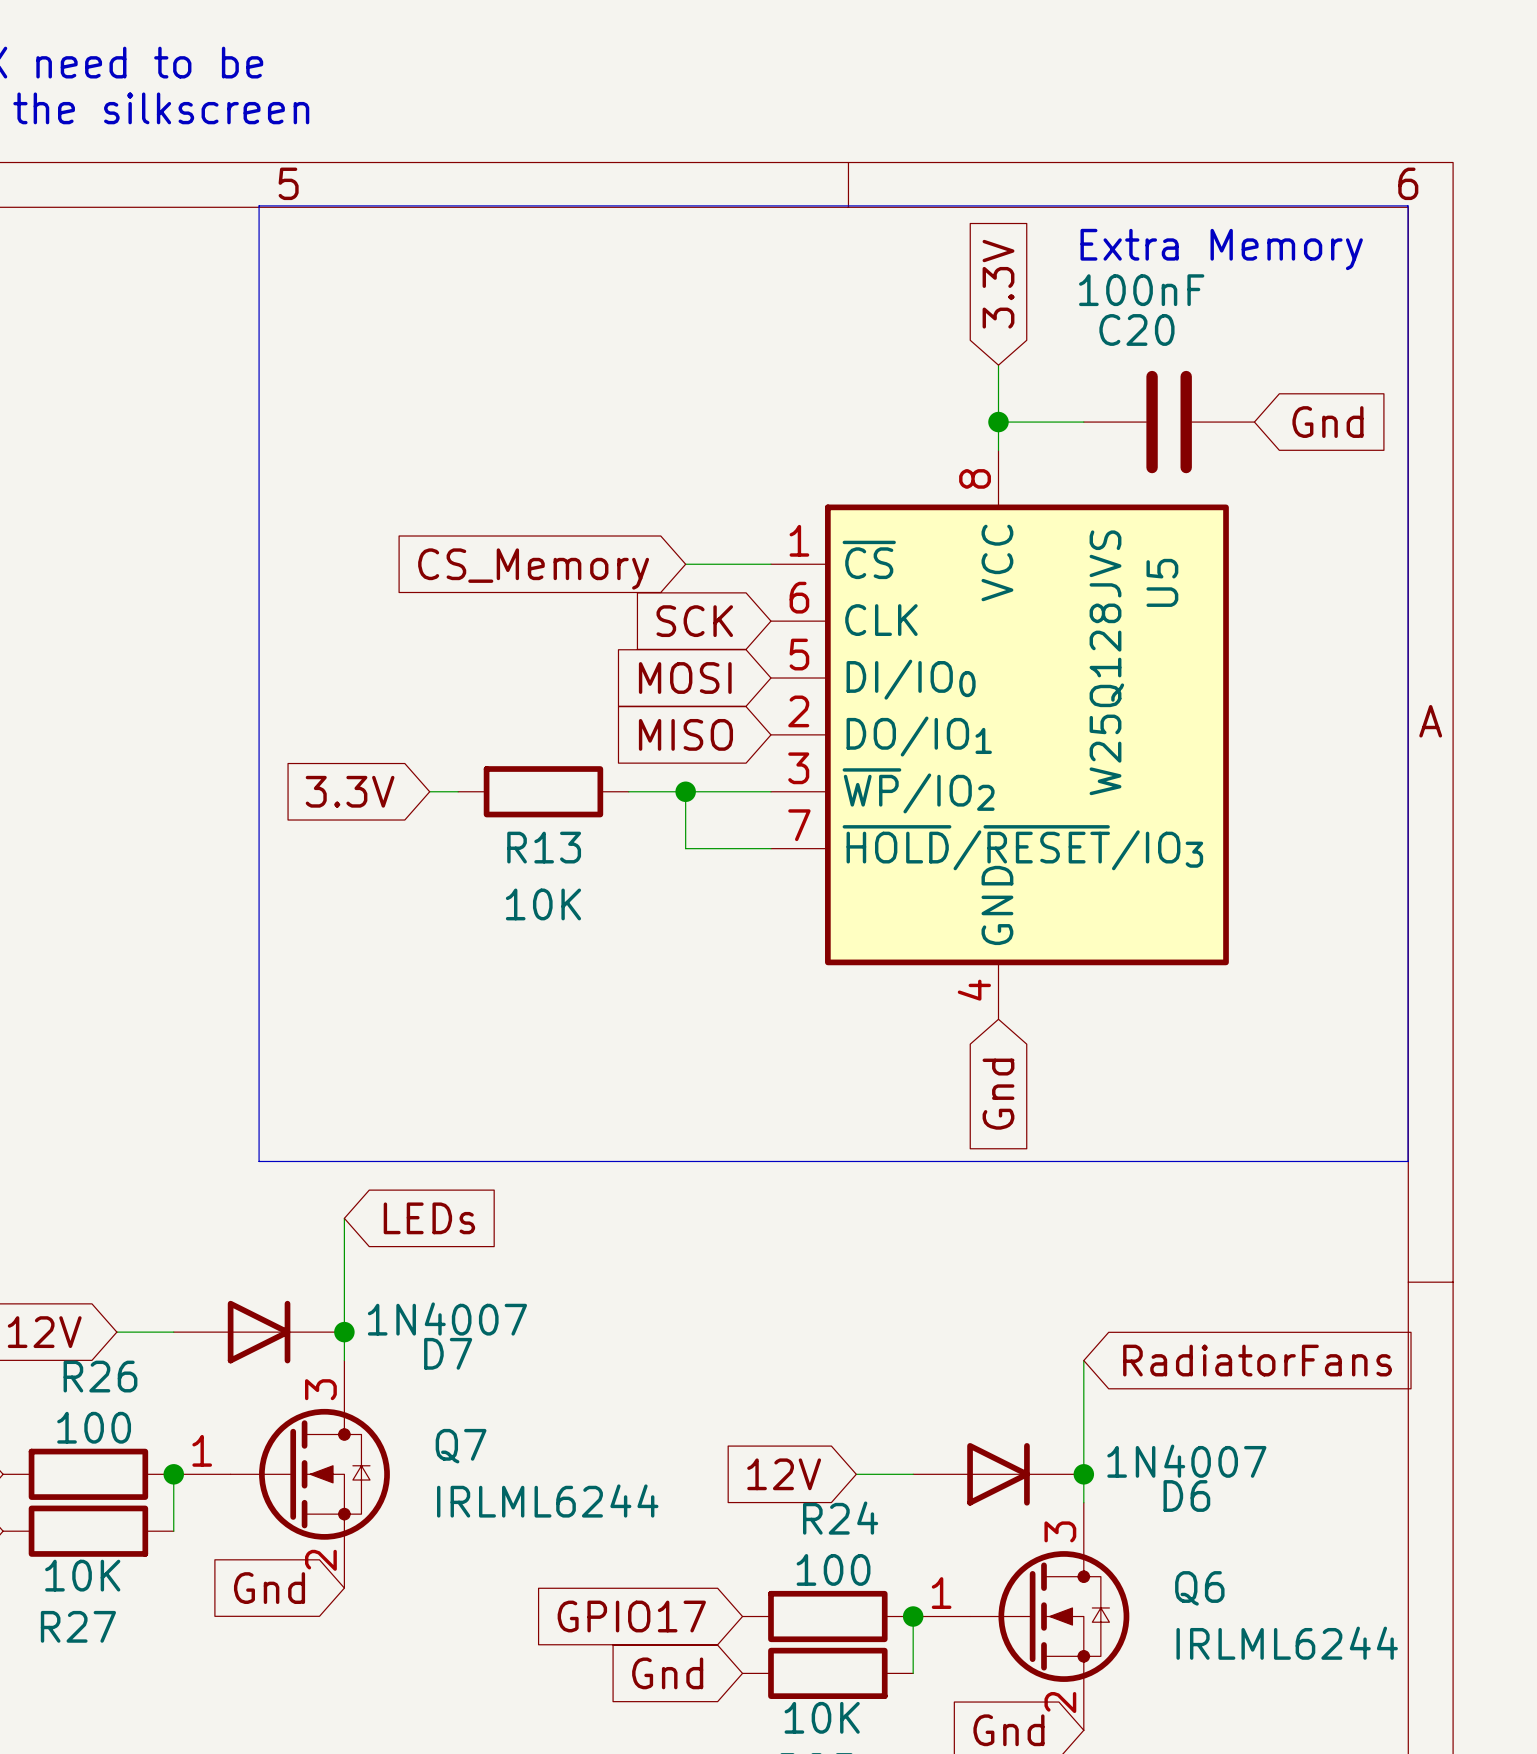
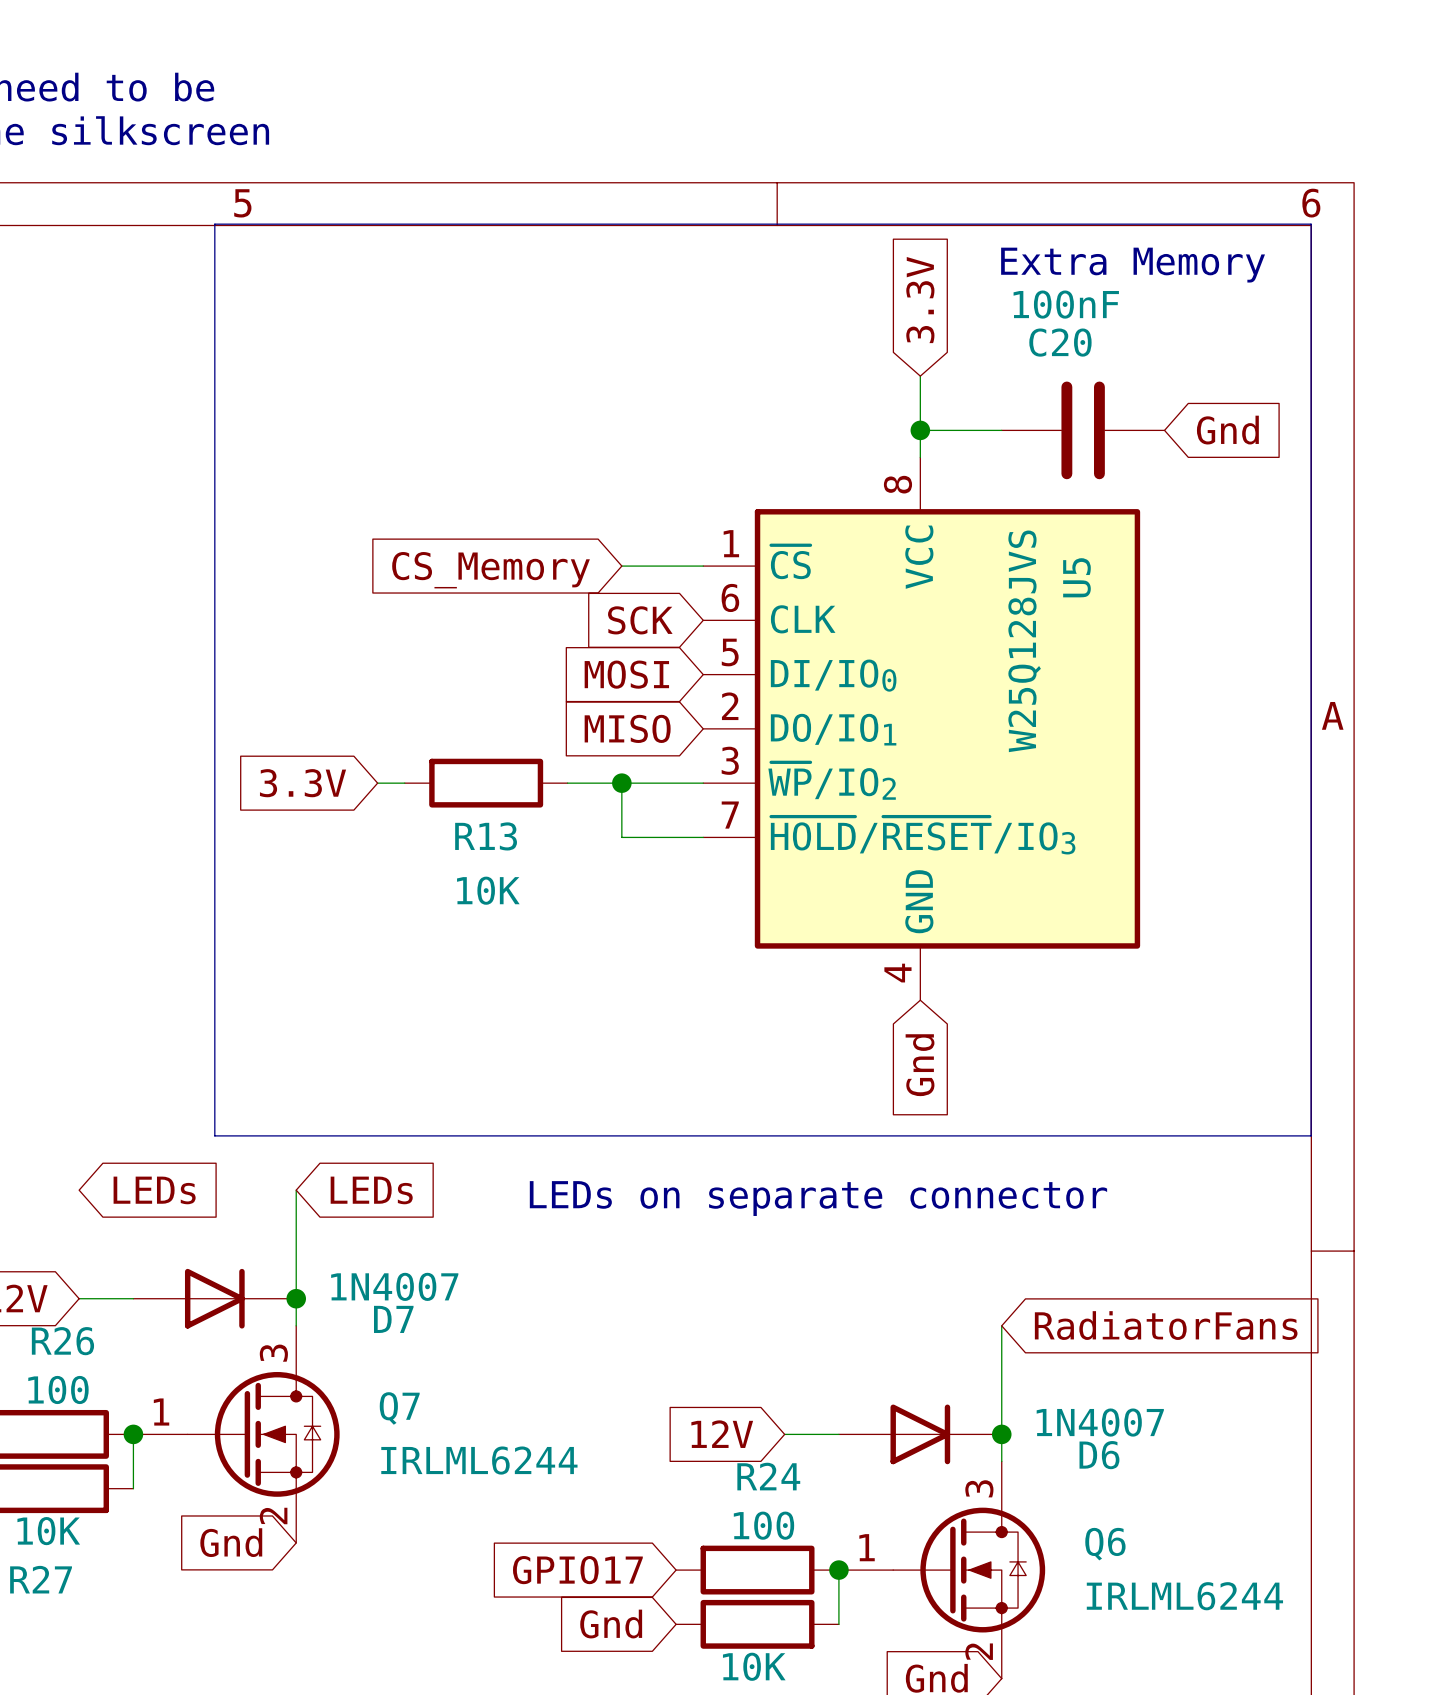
global label: none -> LEDs (154, 1190)
text: none -> LEDs on separate connector (818, 1198)

